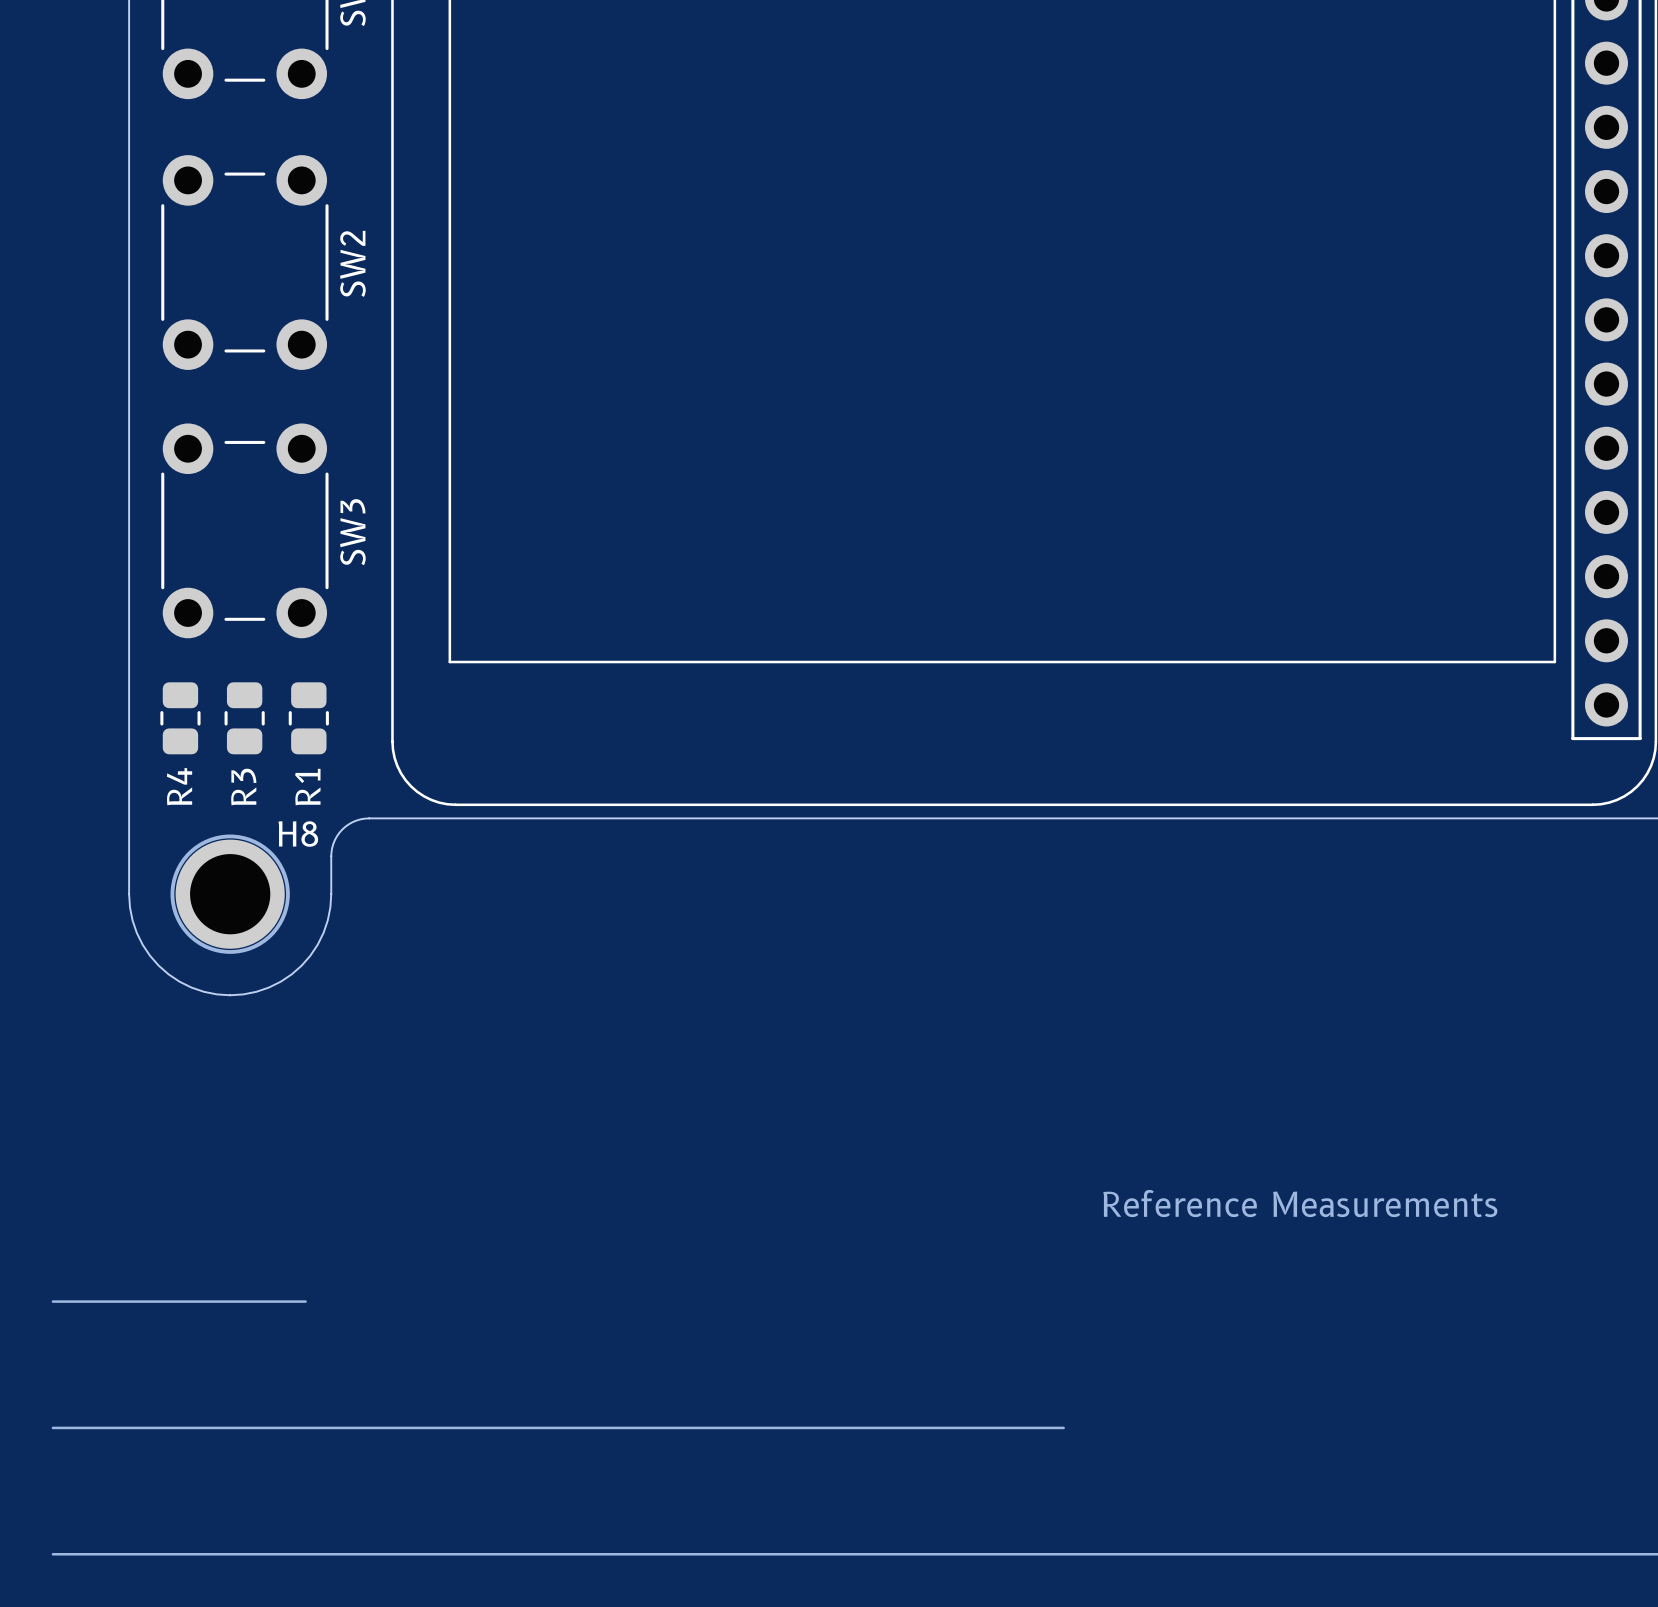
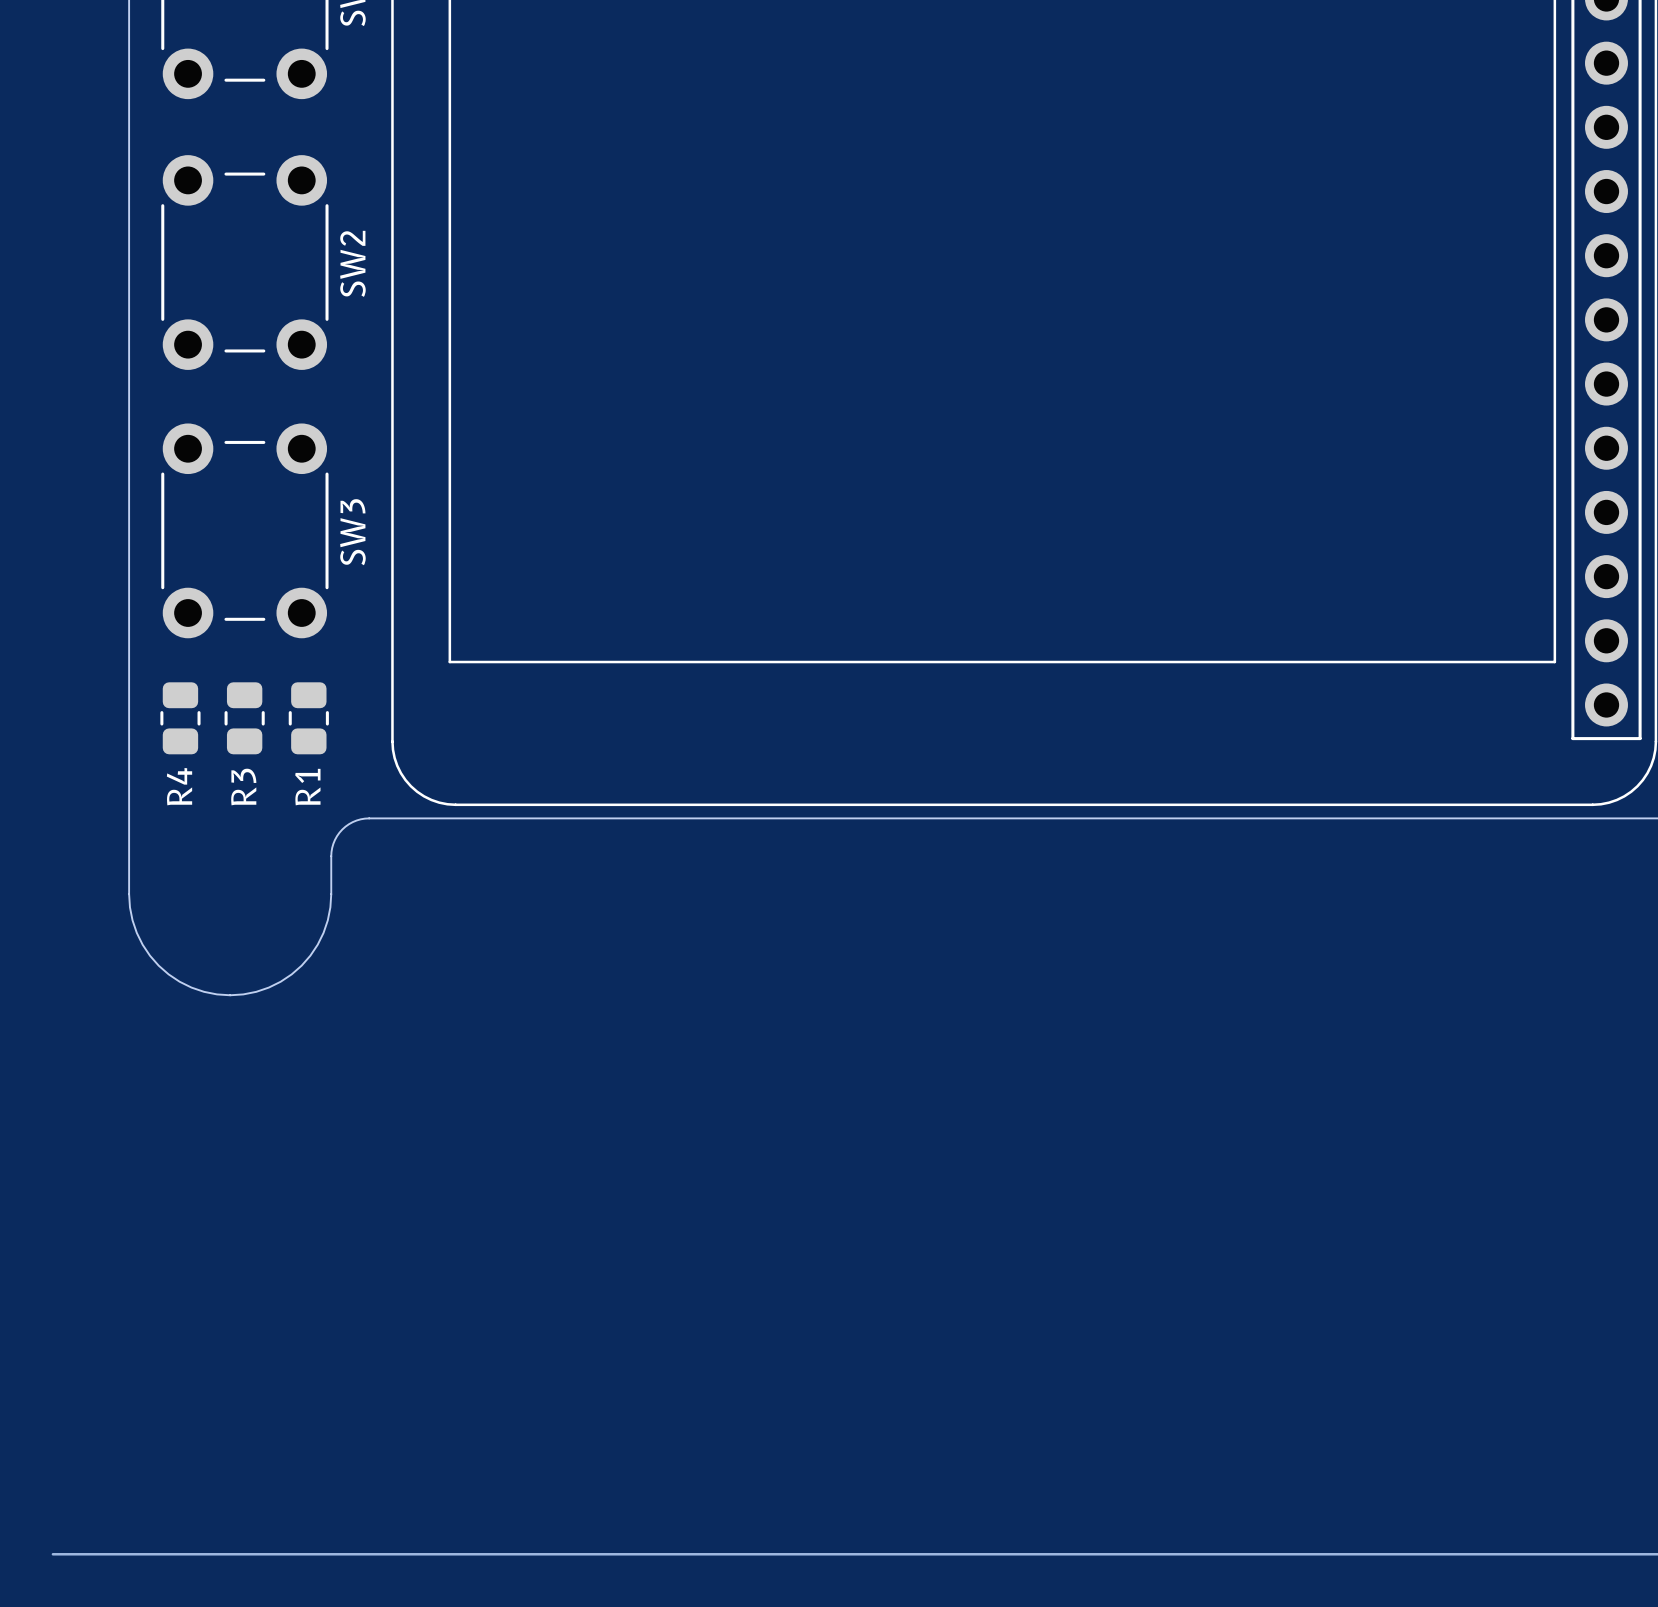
H8: (230, 894) -> none
text: Reference Measurements (1300, 1203) -> none
line: (52, 1301) (305, 1301) -> none
line: (52, 1427) (1063, 1427) -> none

